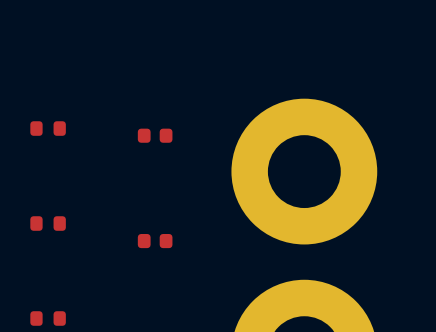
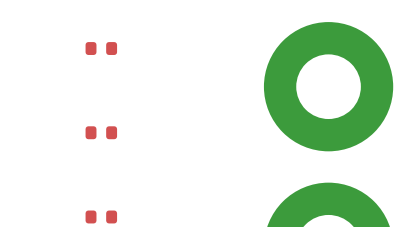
part: (155, 135) -> none
part: (155, 241) -> none

